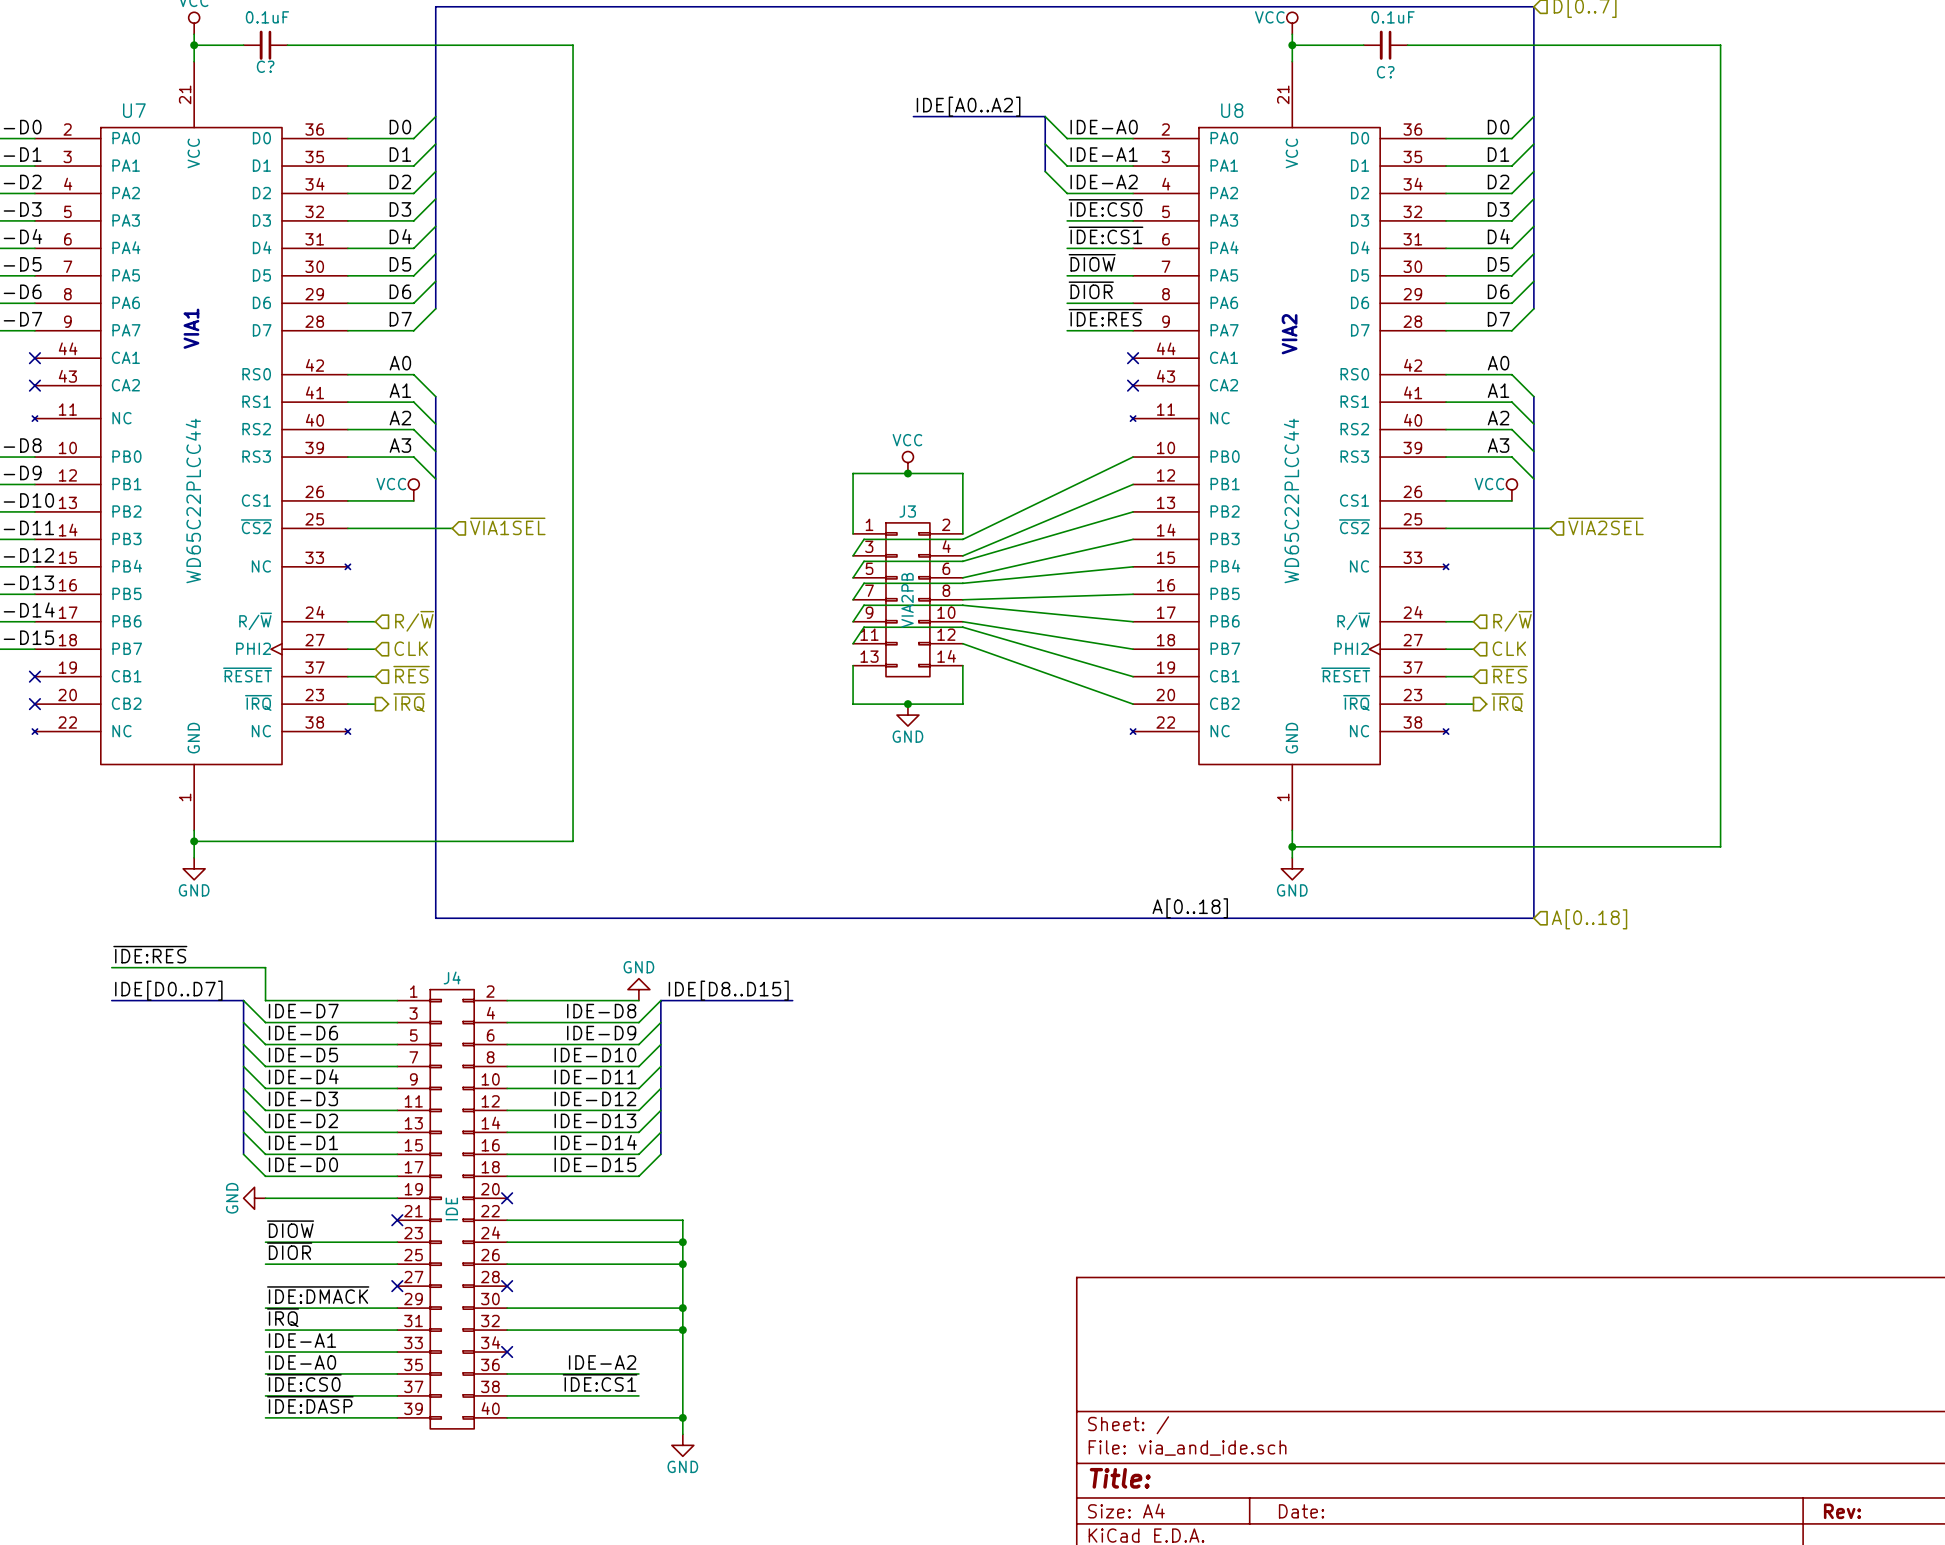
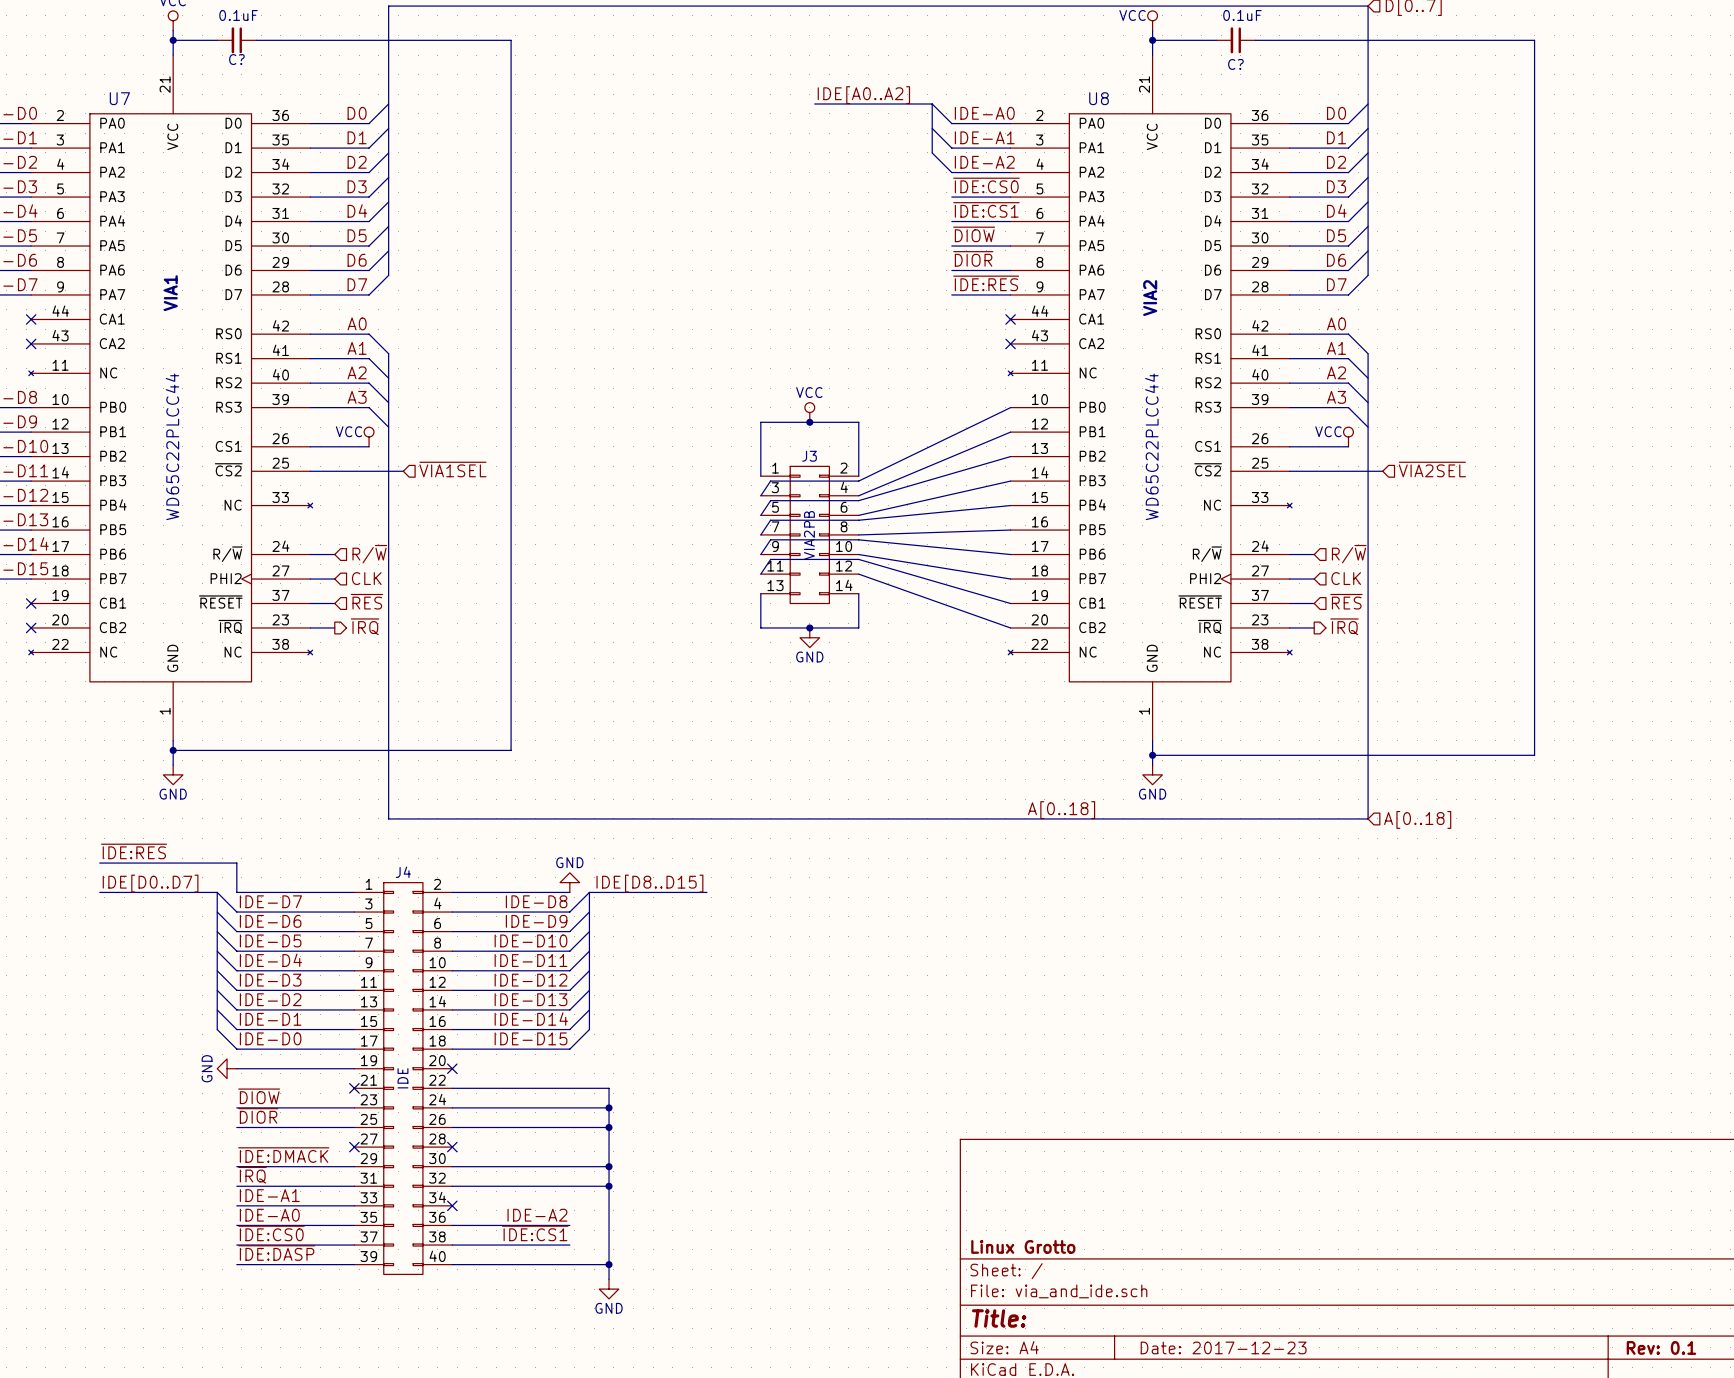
title block: none -> Linux Grotto (1023, 1246)
title block: Date: (1301, 1511) -> Date: 2017-12-23 (1223, 1347)
title block: Rev: (1842, 1511) -> Rev: 0.1 (1661, 1347)

